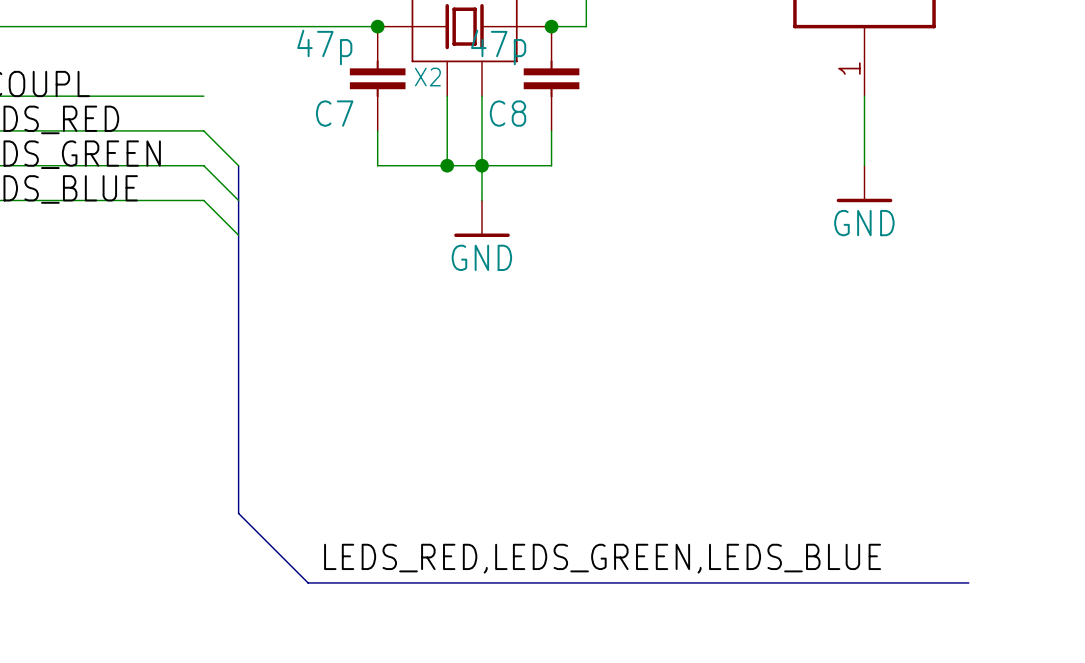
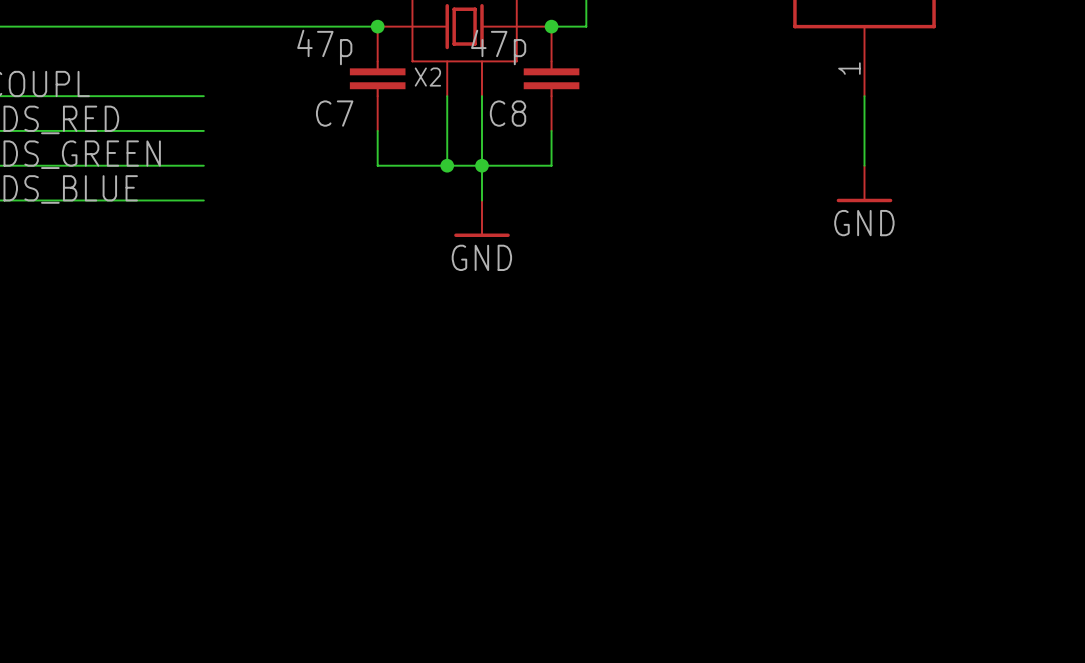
wire: (203, 130) (238, 165) -> none
wire: (203, 165) (238, 200) -> none
bus: (238, 165) (238, 513) (308, 582) (968, 582) -> none
wire: (203, 200) (238, 235) -> none
label: LEDS_RED,LEDS_GREEN,LEDS_BLUE (602, 558) -> none

